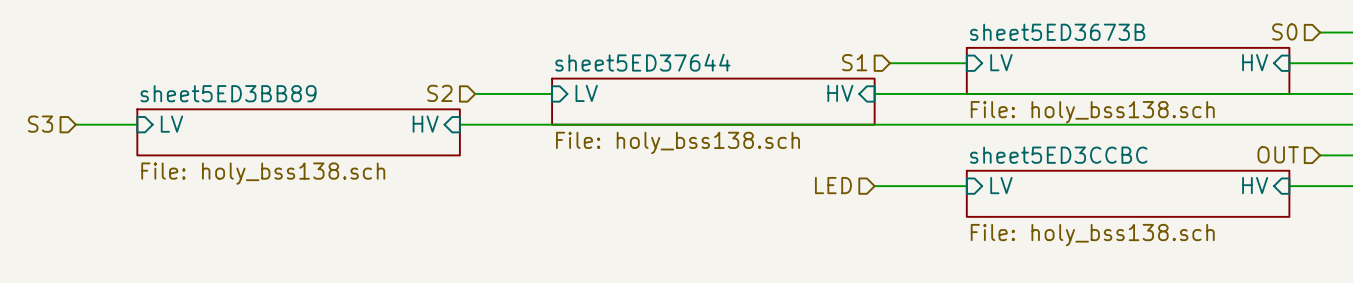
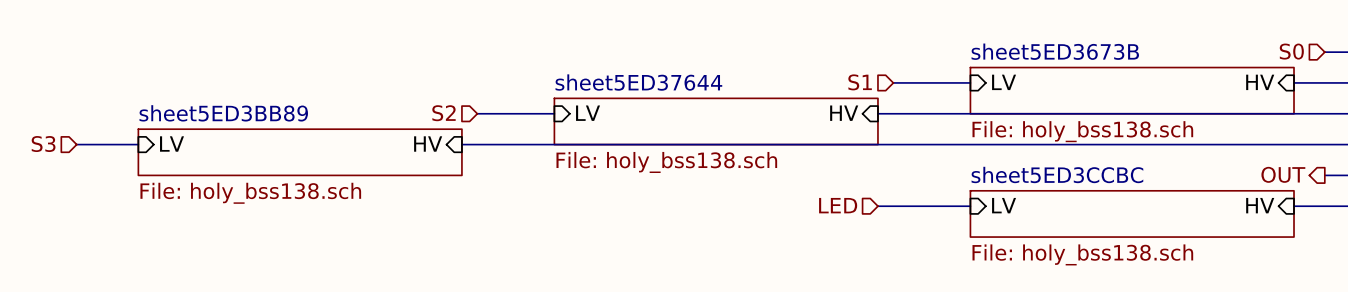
hierarchical label shape: input (1278, 154) -> output (1283, 174)

